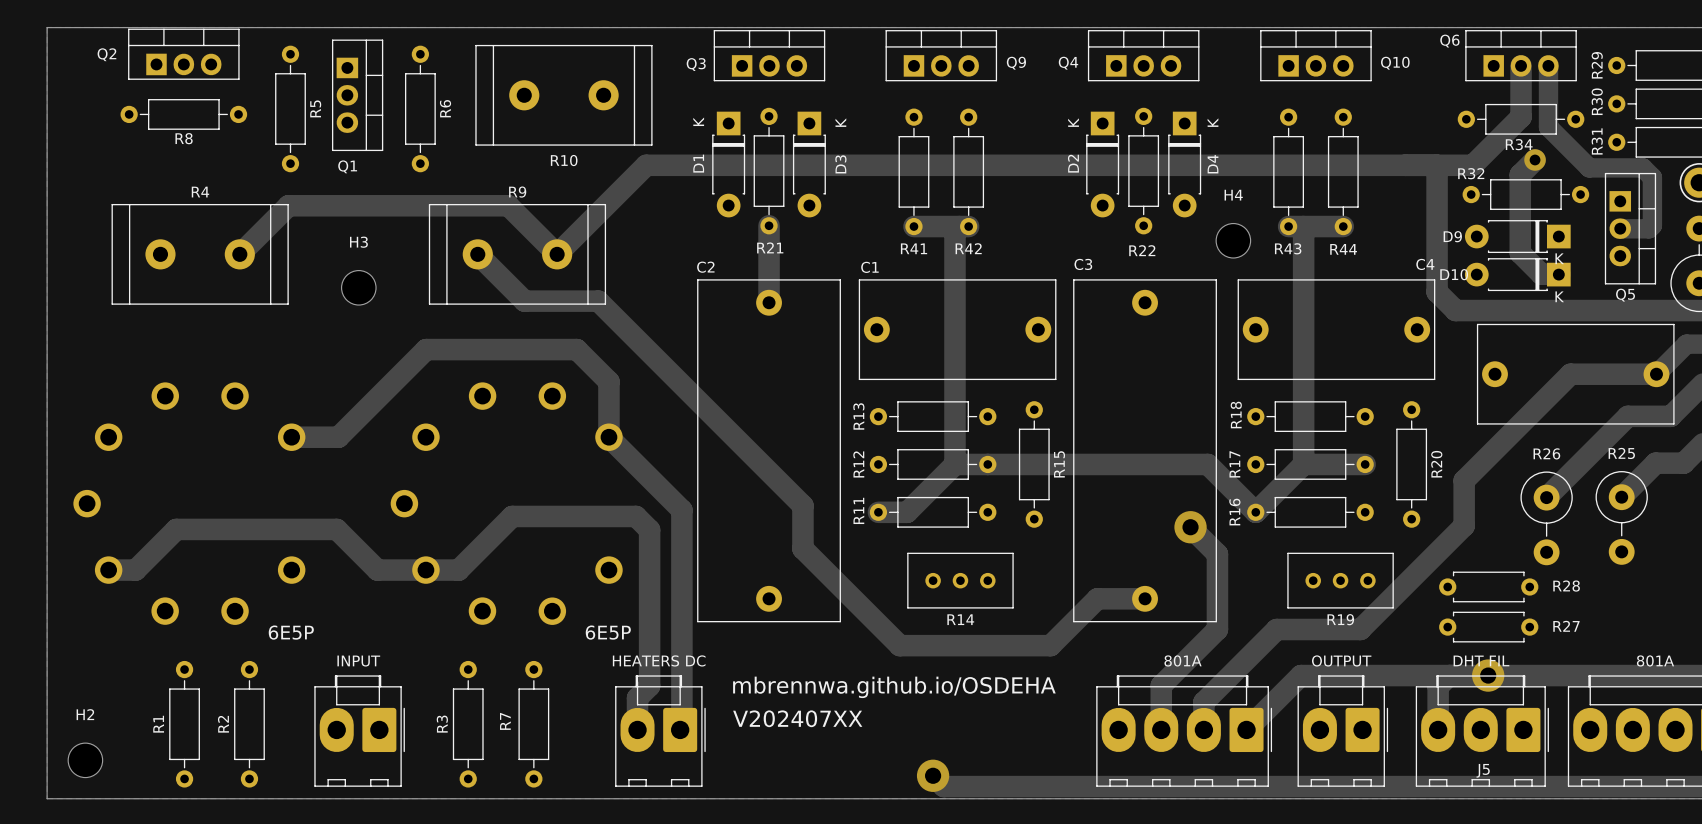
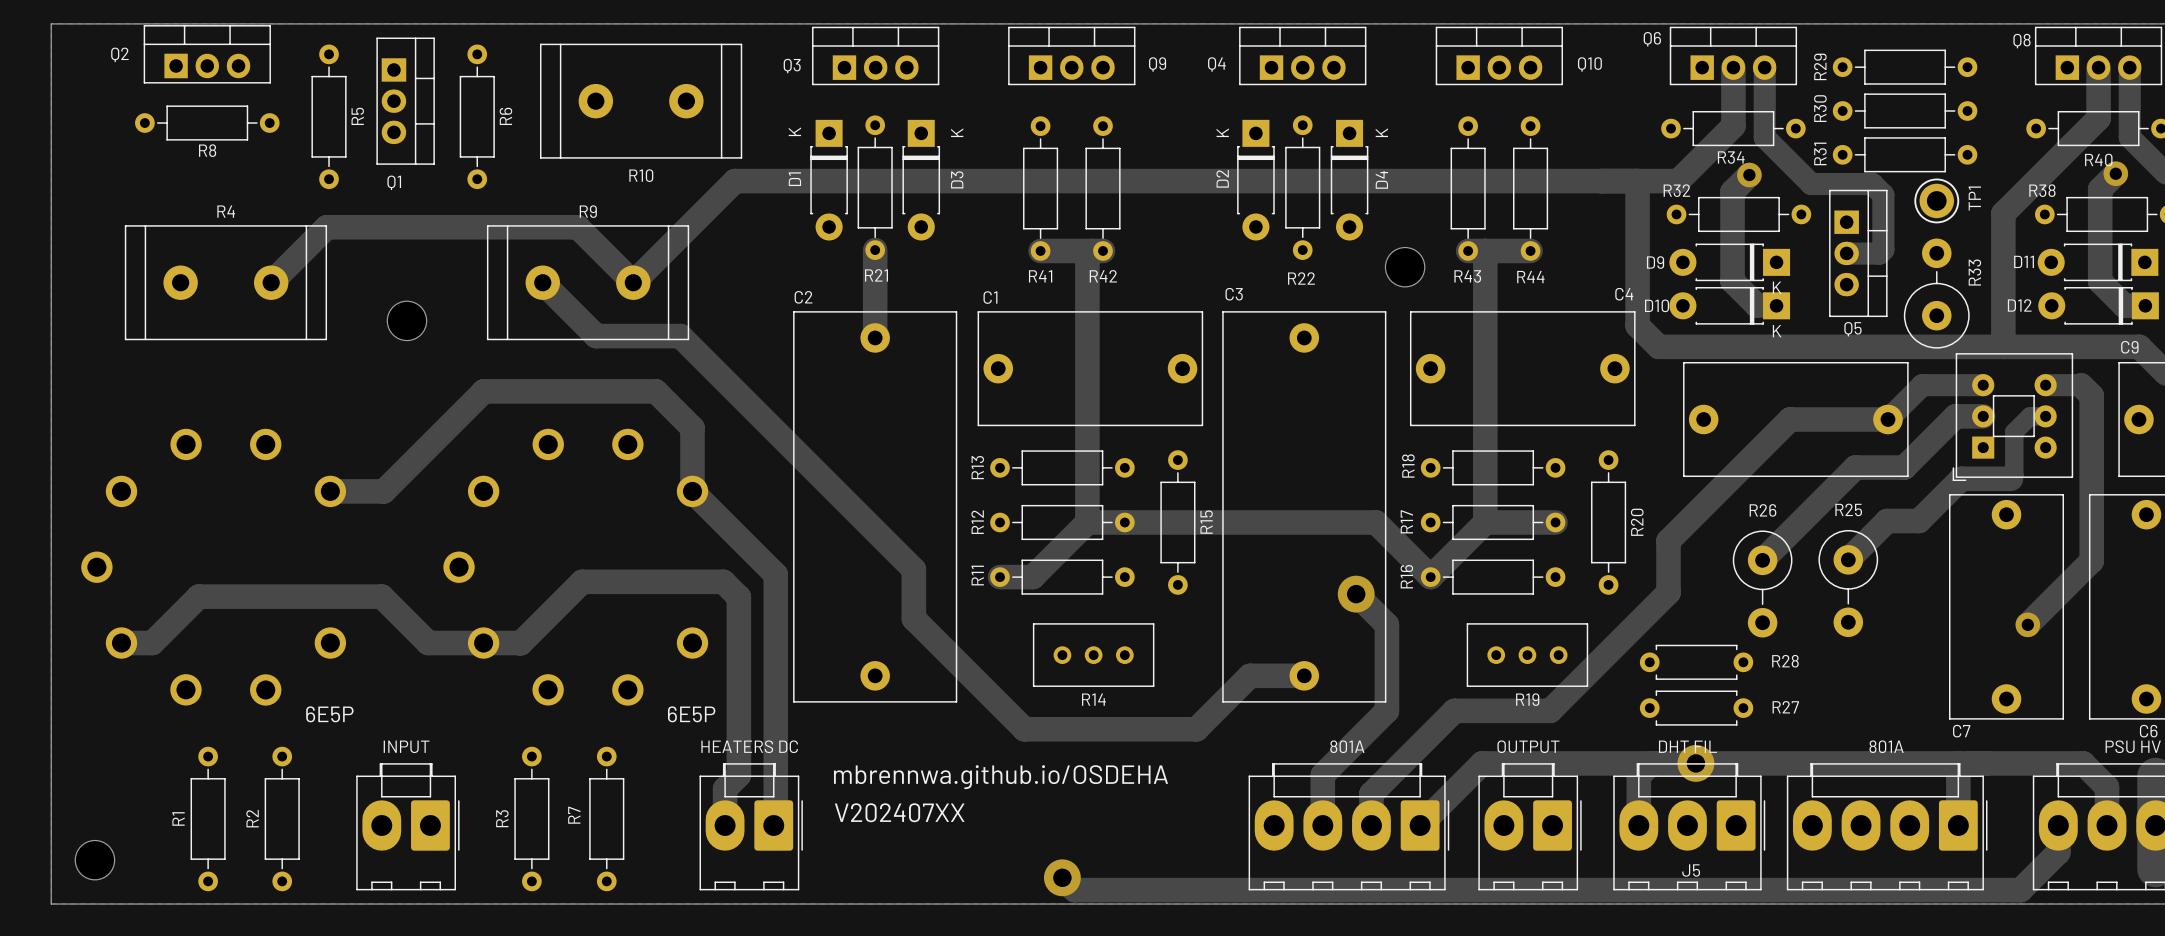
H4 name: H4 (1233, 195) -> none
H3 name: H3 (358, 242) -> none
H2 name: H2 (85, 714) -> none

